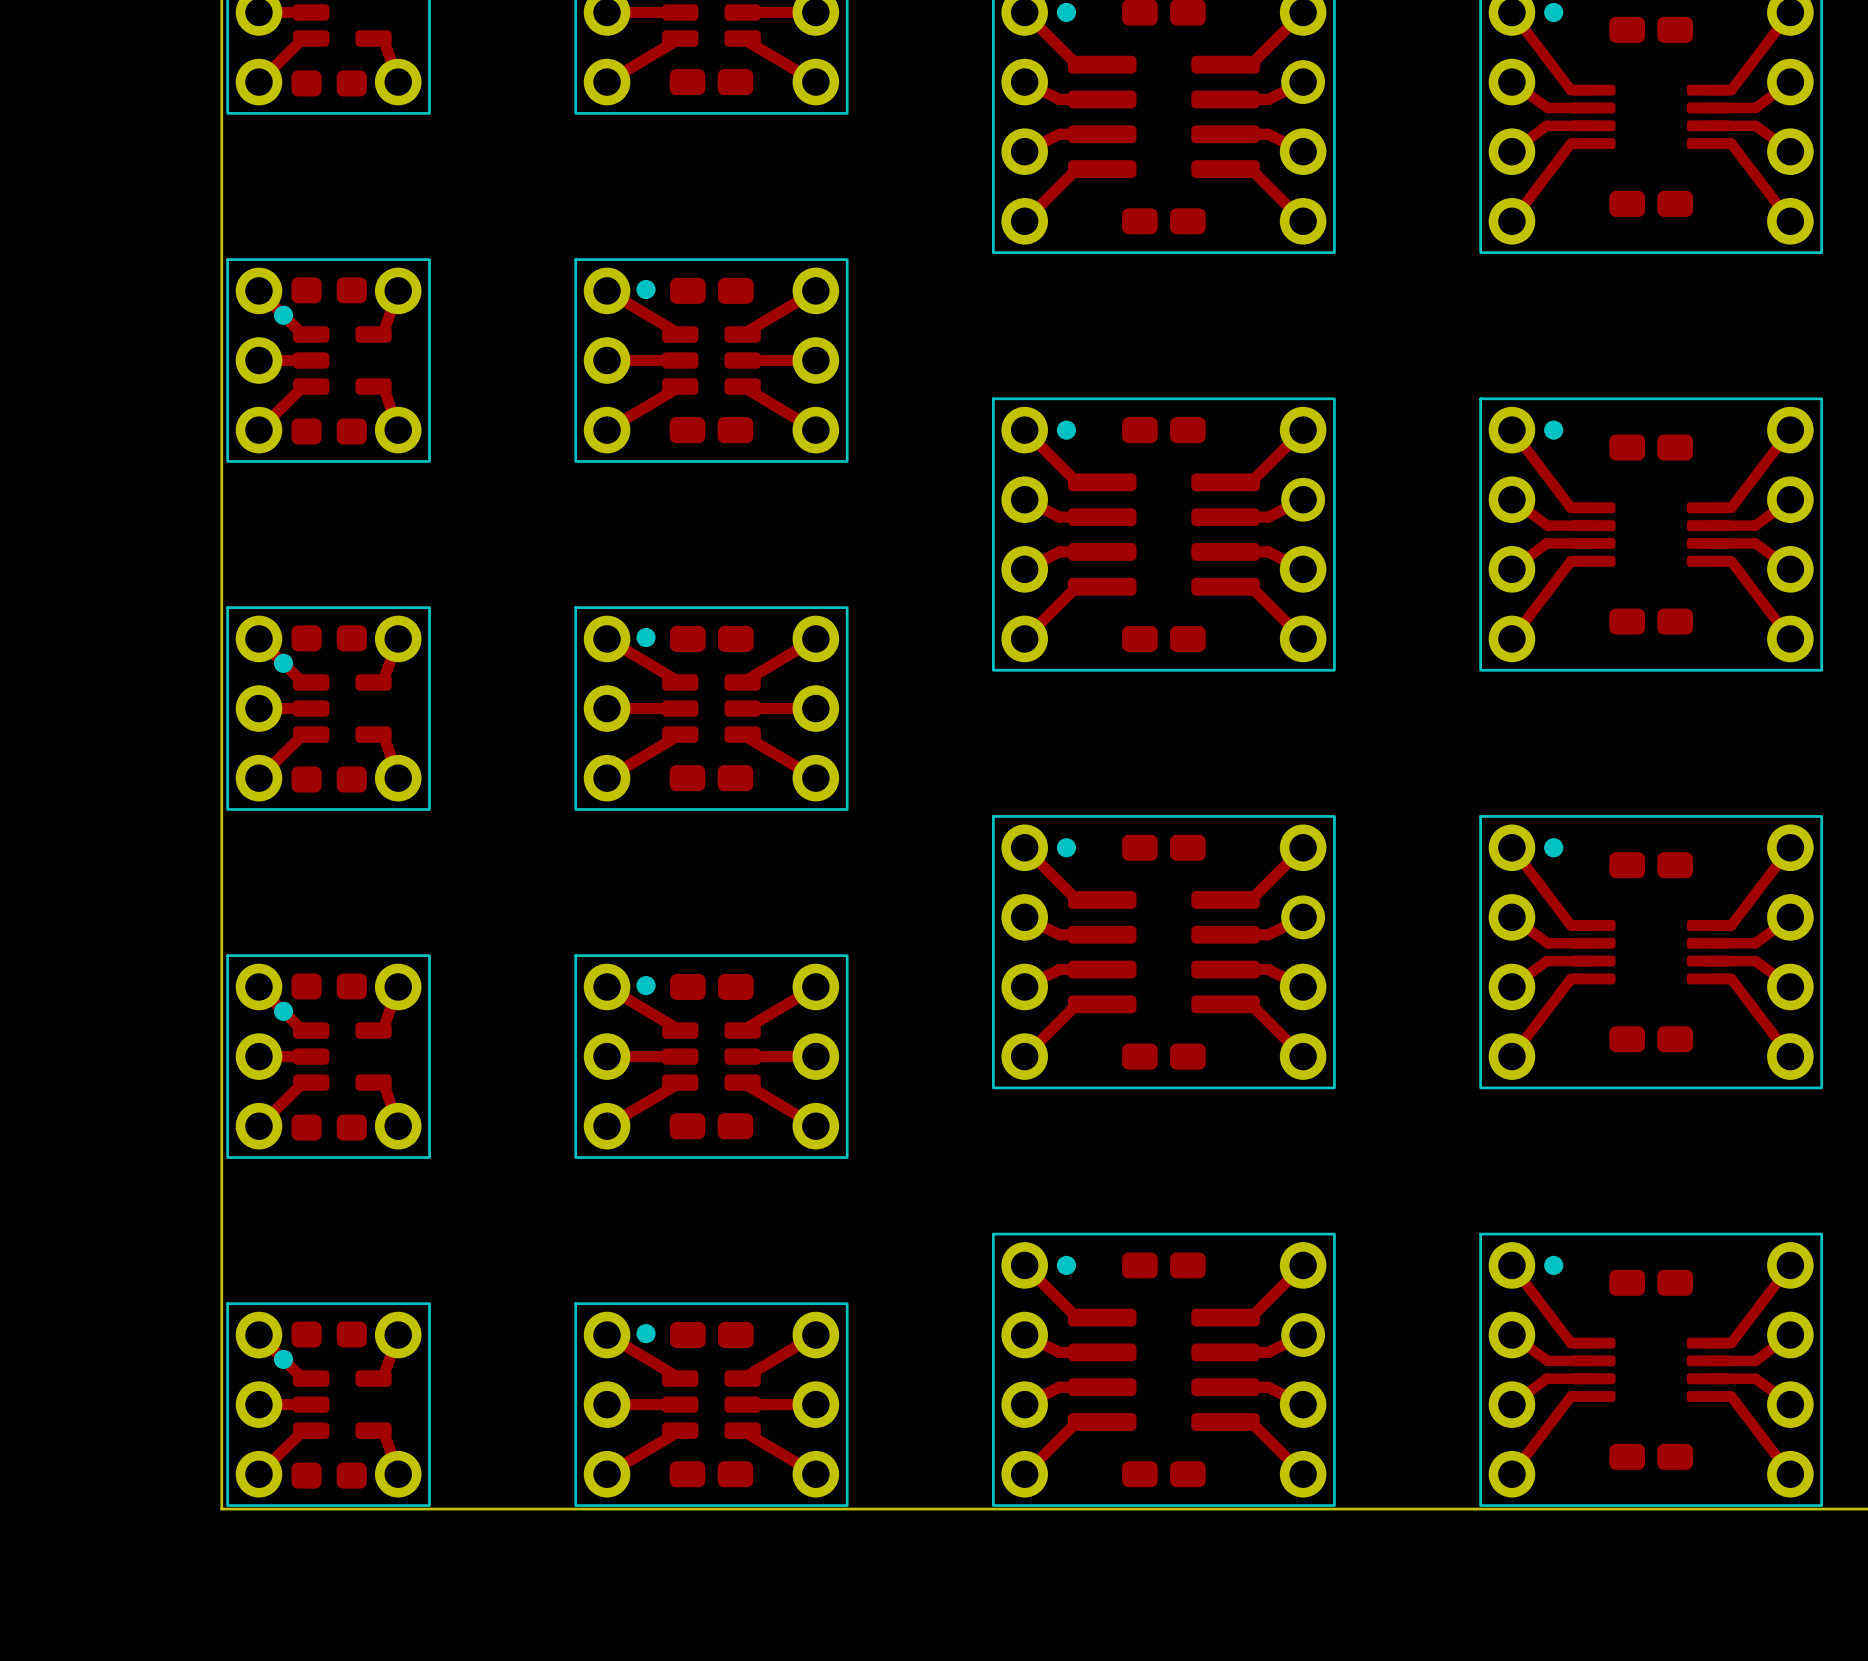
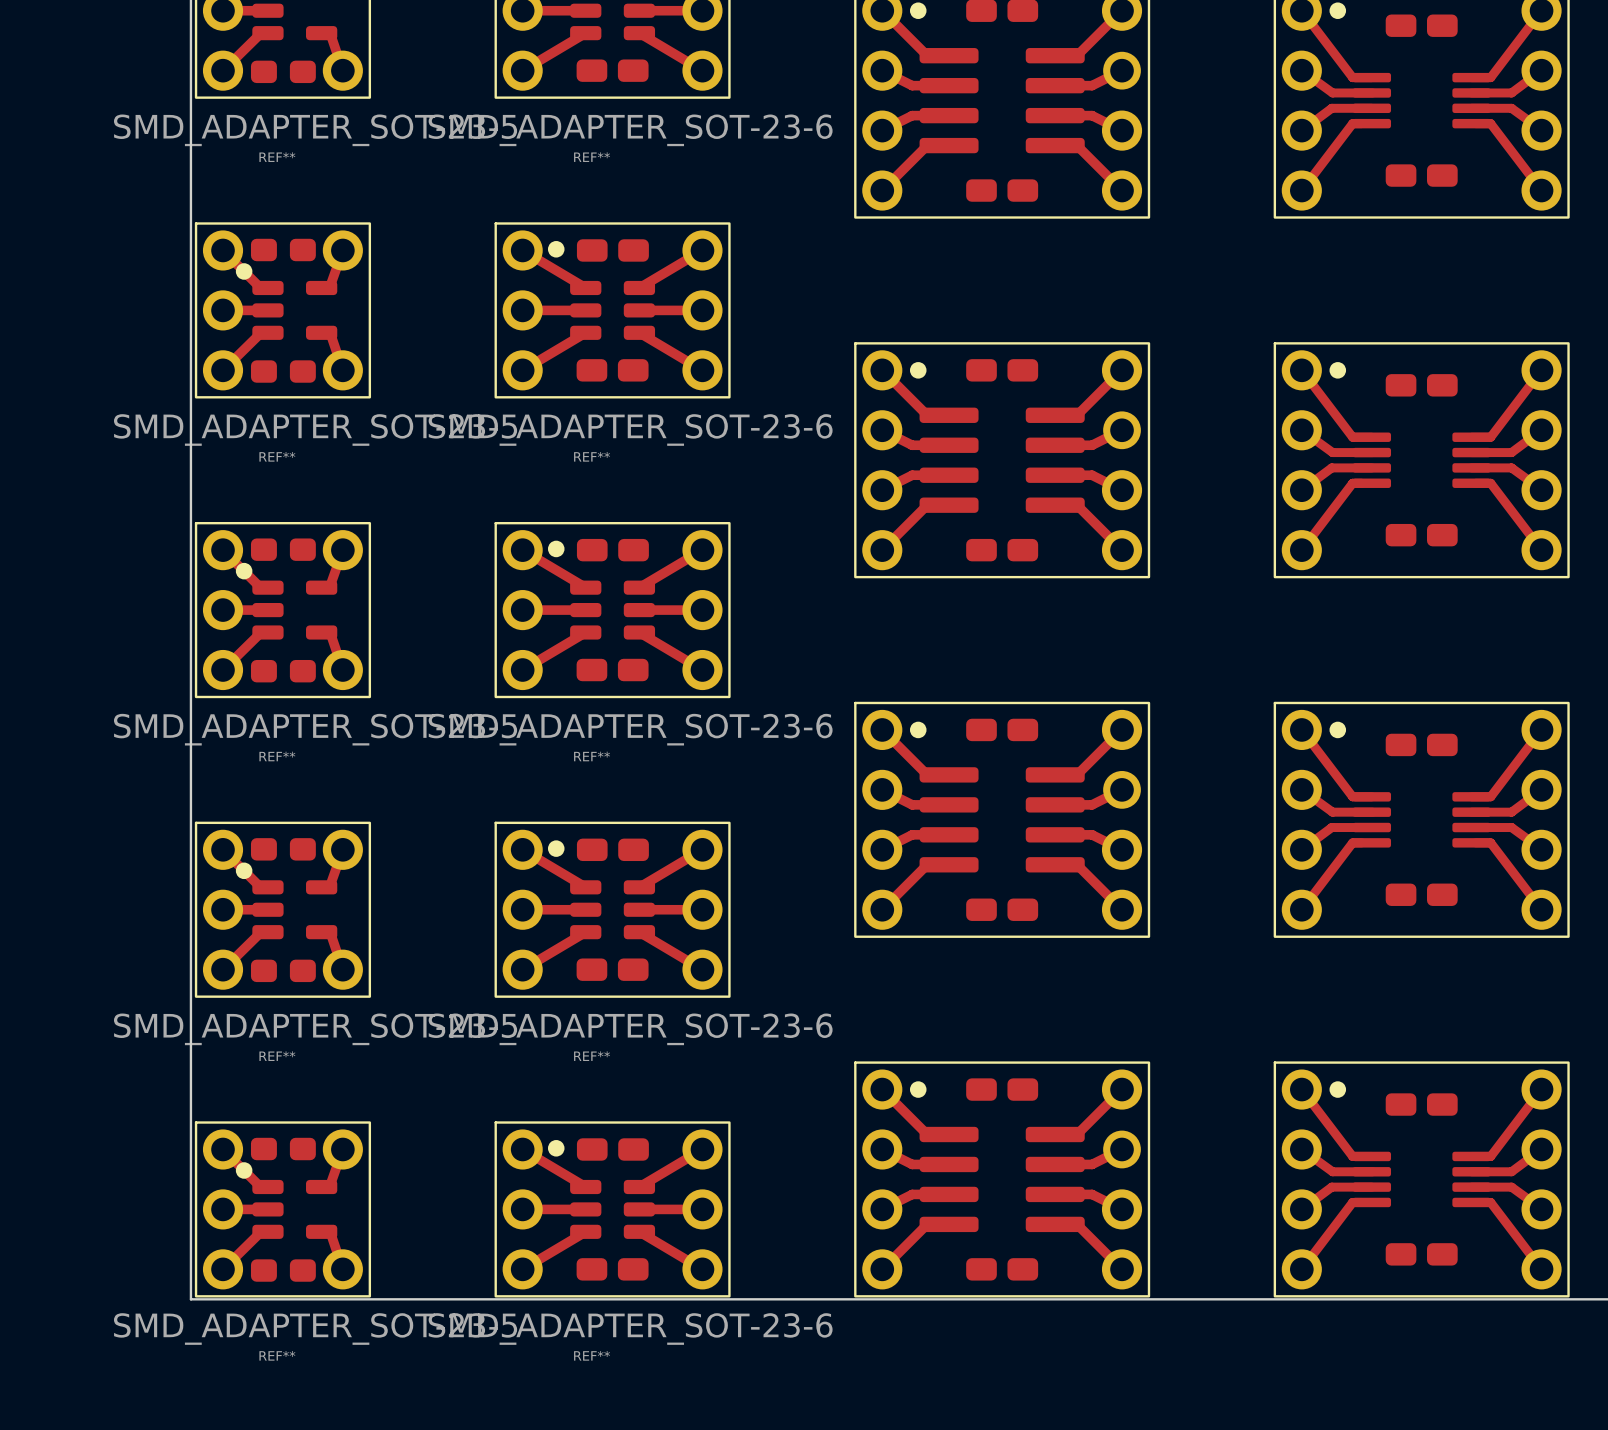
REF** value: none -> SMD_ADAPTER_SOT-23-5 (315, 130)
REF** value: none -> SMD_ADAPTER_SOT-23-6 (630, 130)
REF** name: none -> REF** (277, 157)
REF** name: none -> REF** (592, 157)
REF** value: none -> SMD_ADAPTER_SOT-23-5 (315, 430)
REF** value: none -> SMD_ADAPTER_SOT-23-6 (630, 430)
REF** name: none -> REF** (277, 456)
REF** name: none -> REF** (592, 456)
REF** value: none -> SMD_ADAPTER_SOT-23-5 (315, 729)
REF** value: none -> SMD_ADAPTER_SOT-23-6 (630, 729)
REF** name: none -> REF** (277, 756)
REF** name: none -> REF** (592, 756)
REF** value: none -> SMD_ADAPTER_SOT-23-5 (315, 1029)
REF** value: none -> SMD_ADAPTER_SOT-23-6 (630, 1029)
REF** name: none -> REF** (277, 1056)
REF** name: none -> REF** (592, 1056)
REF** value: none -> SMD_ADAPTER_SOT-23-5 (315, 1329)
REF** value: none -> SMD_ADAPTER_SOT-23-6 (630, 1329)
REF** name: none -> REF** (277, 1355)
REF** name: none -> REF** (592, 1355)

